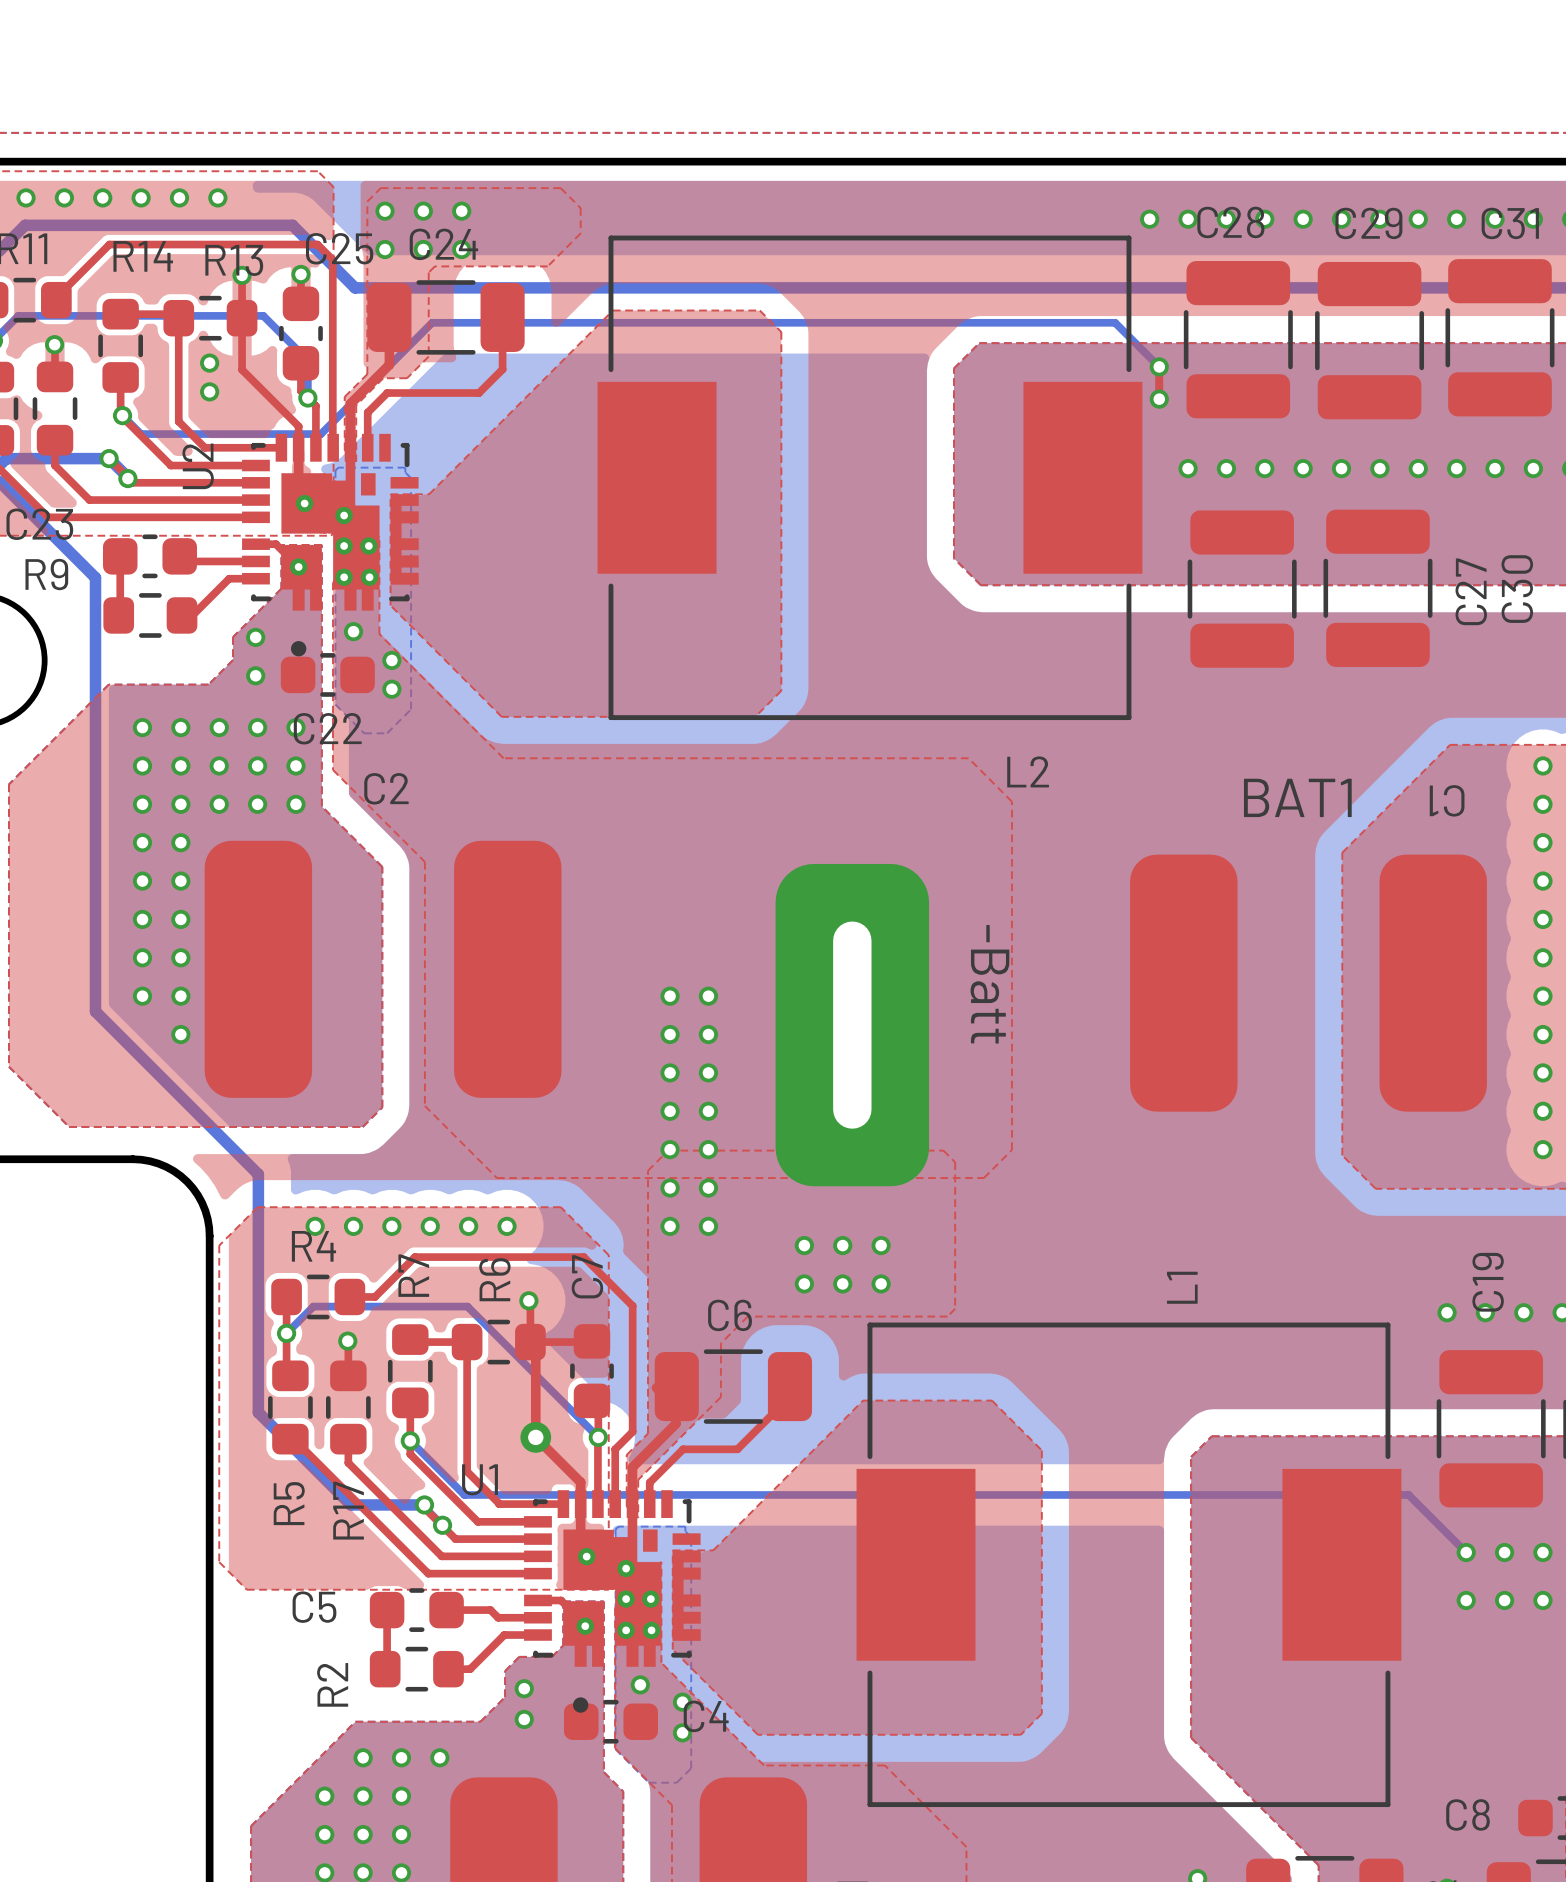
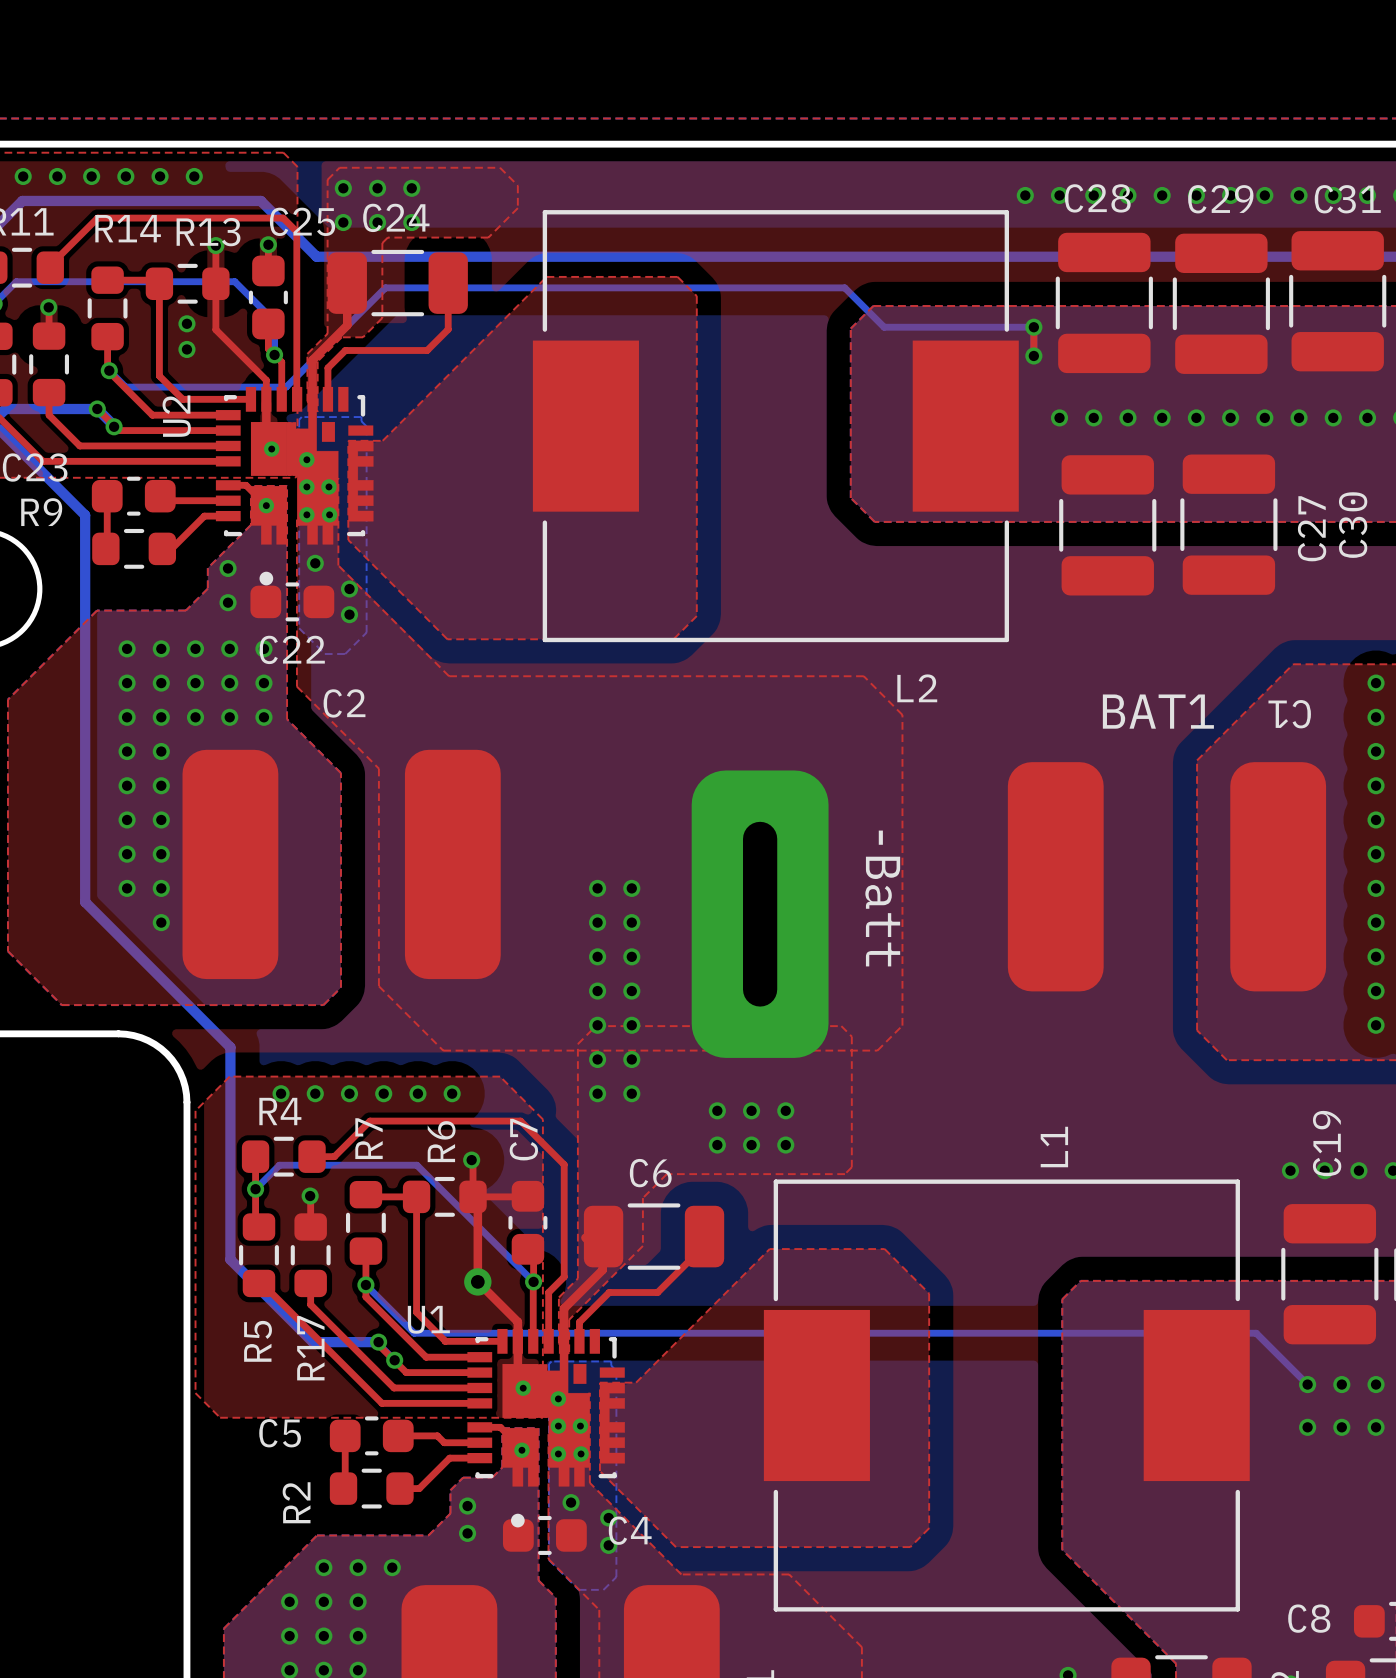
bottom track: (947, 322) (1115, 322) (1159, 366) -> (844, 287) (884, 327) (1033, 327)

